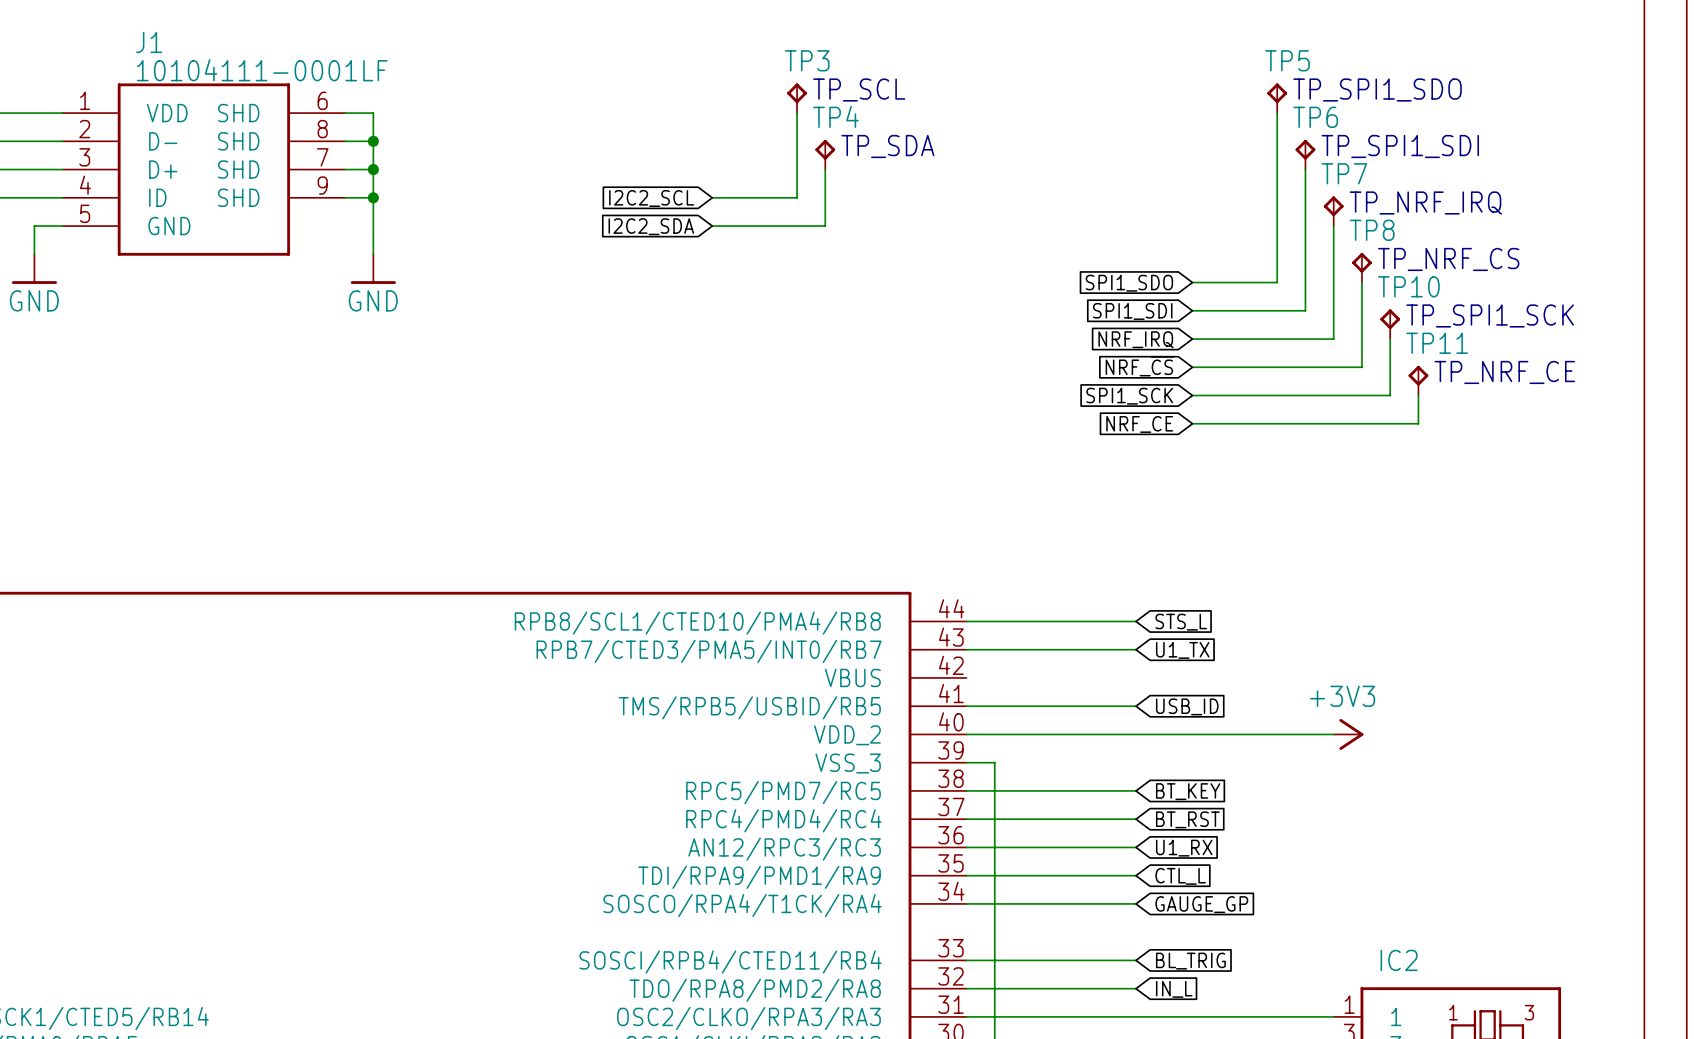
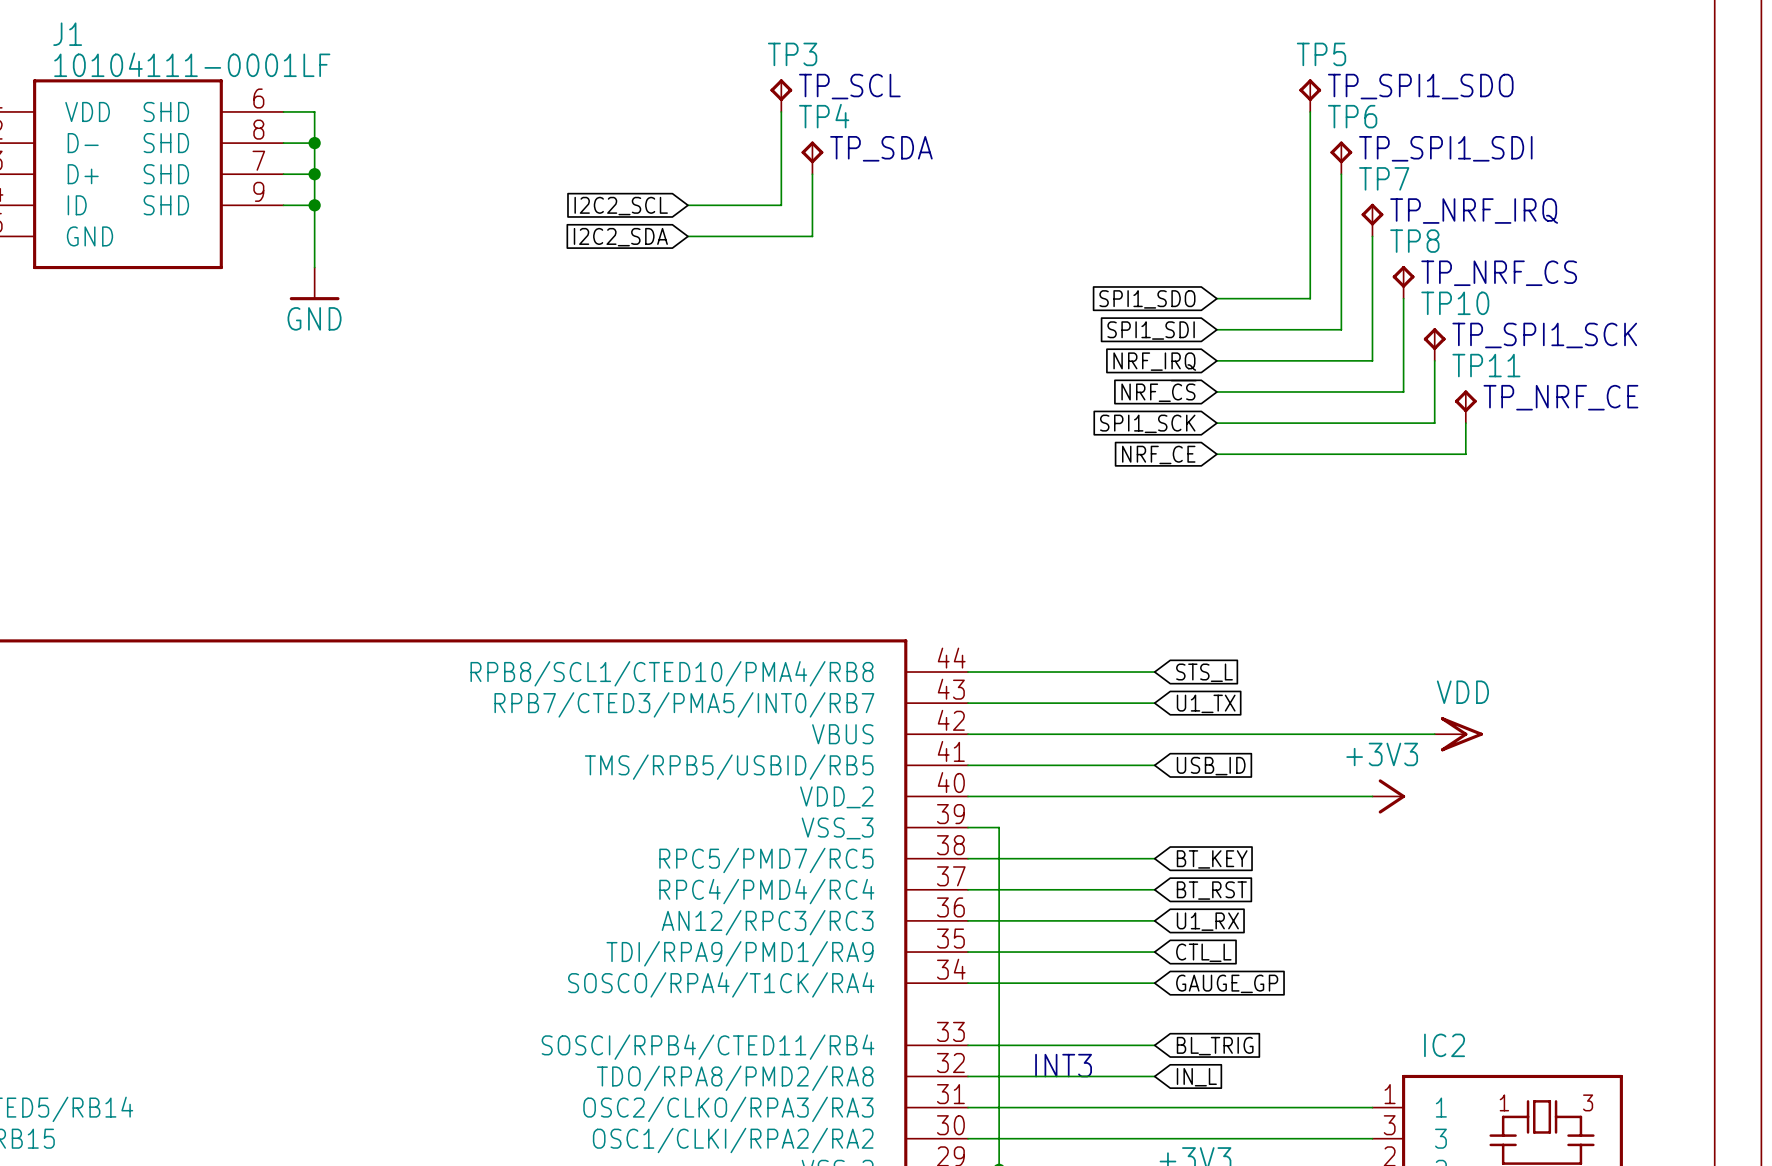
wire: none -> (968, 734) (1434, 734)
power symbol: none -> VDD (1458, 734)
text: none -> INT3 (1063, 1065)

